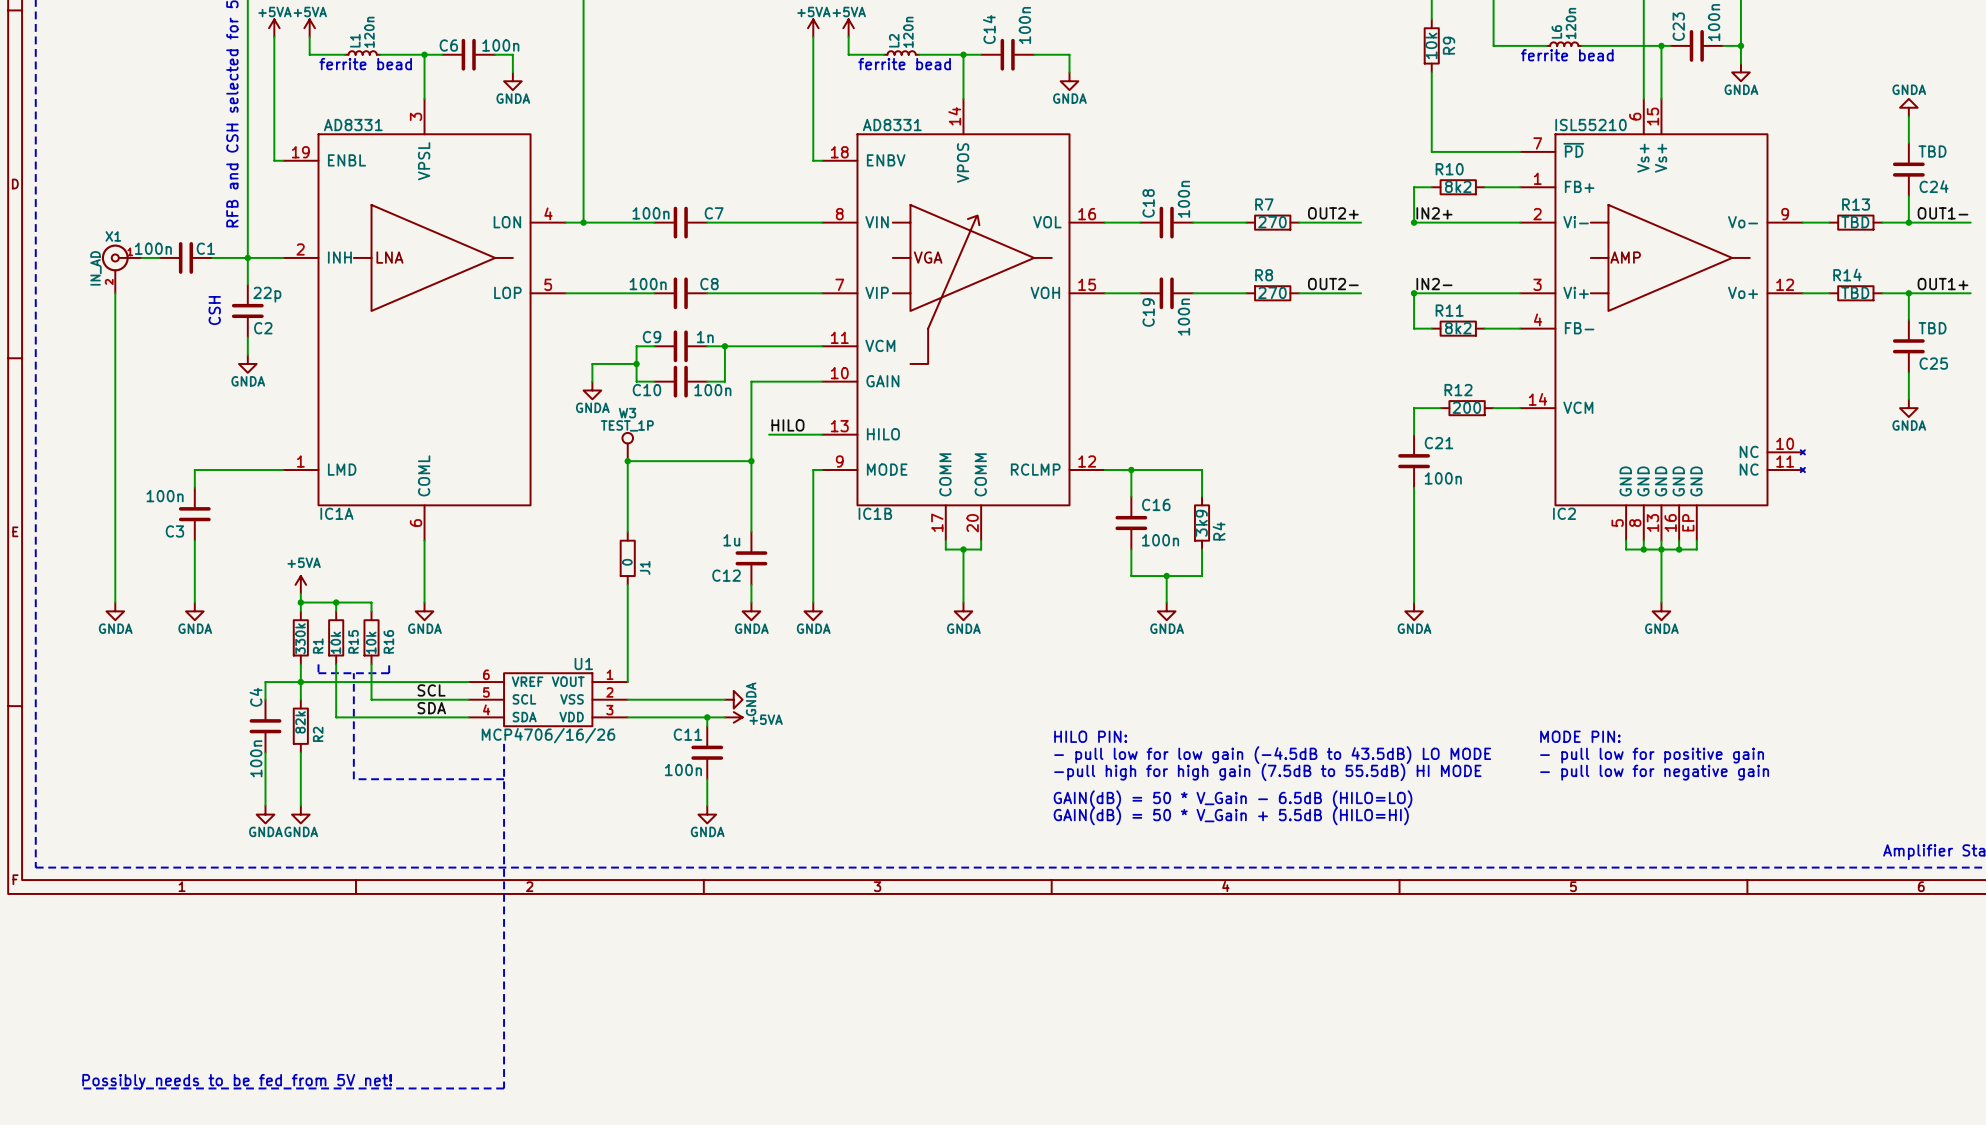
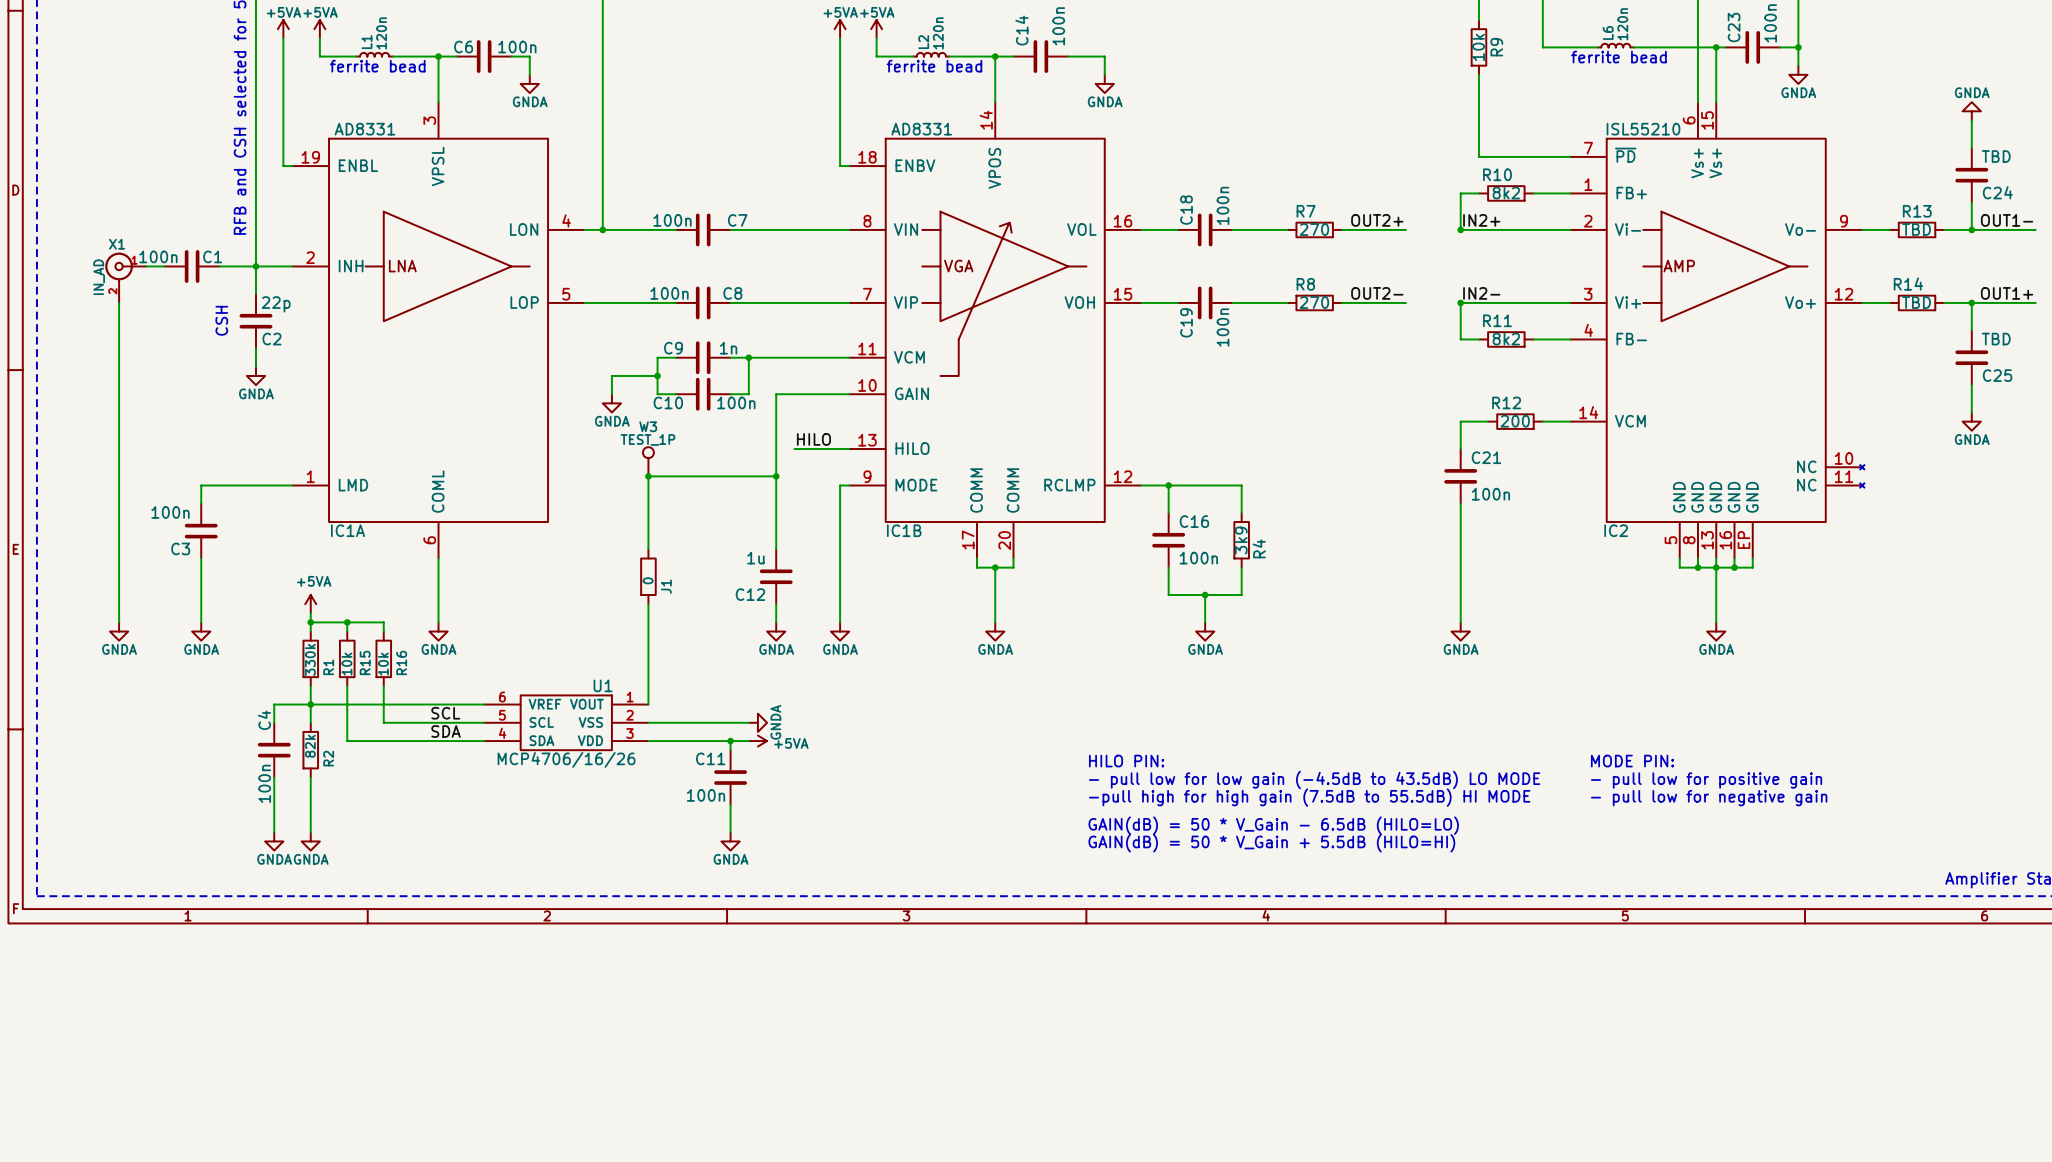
line: (318, 664) (318, 673) (389, 673) (389, 664) -> none
line: (353, 673) (353, 779) (504, 779) -> none
line: (504, 743) (504, 1088) (79, 1088) -> none
text: Possibly needs to be fed from 5V net! (237, 1081) -> none

